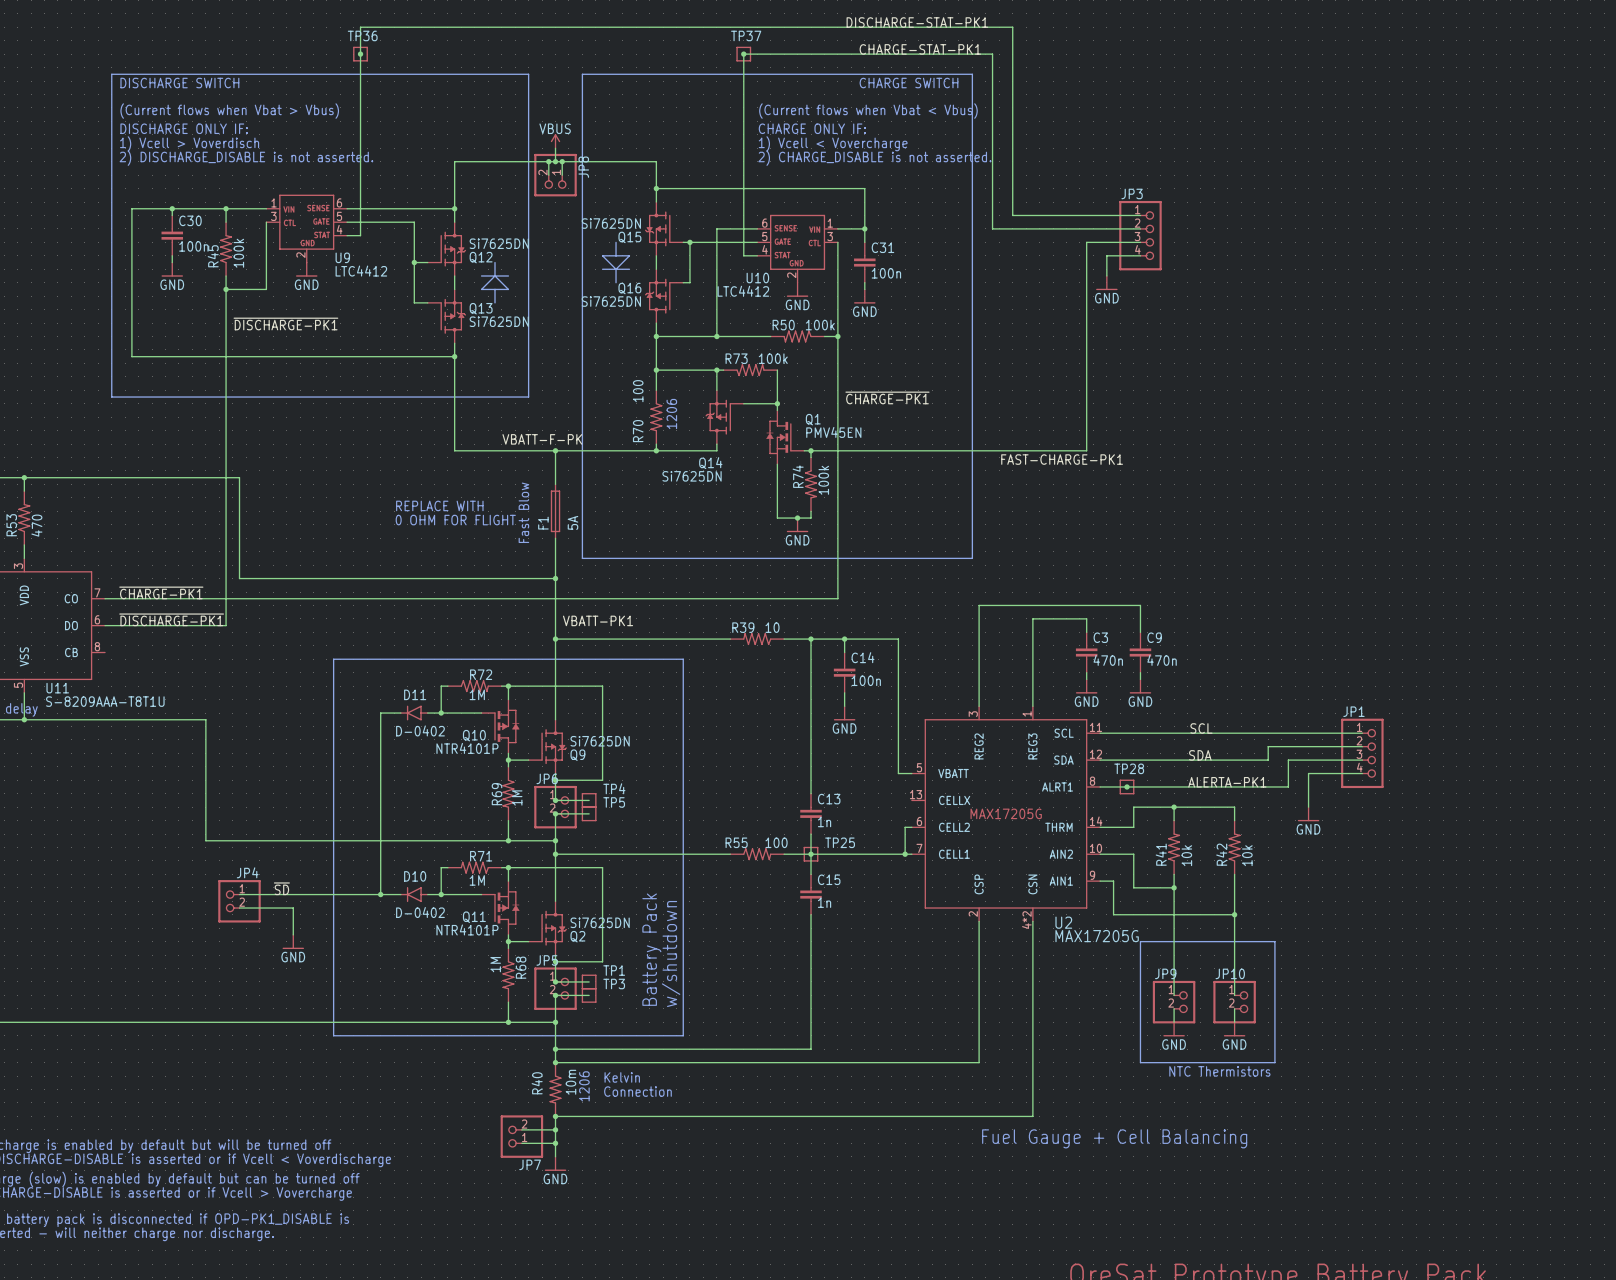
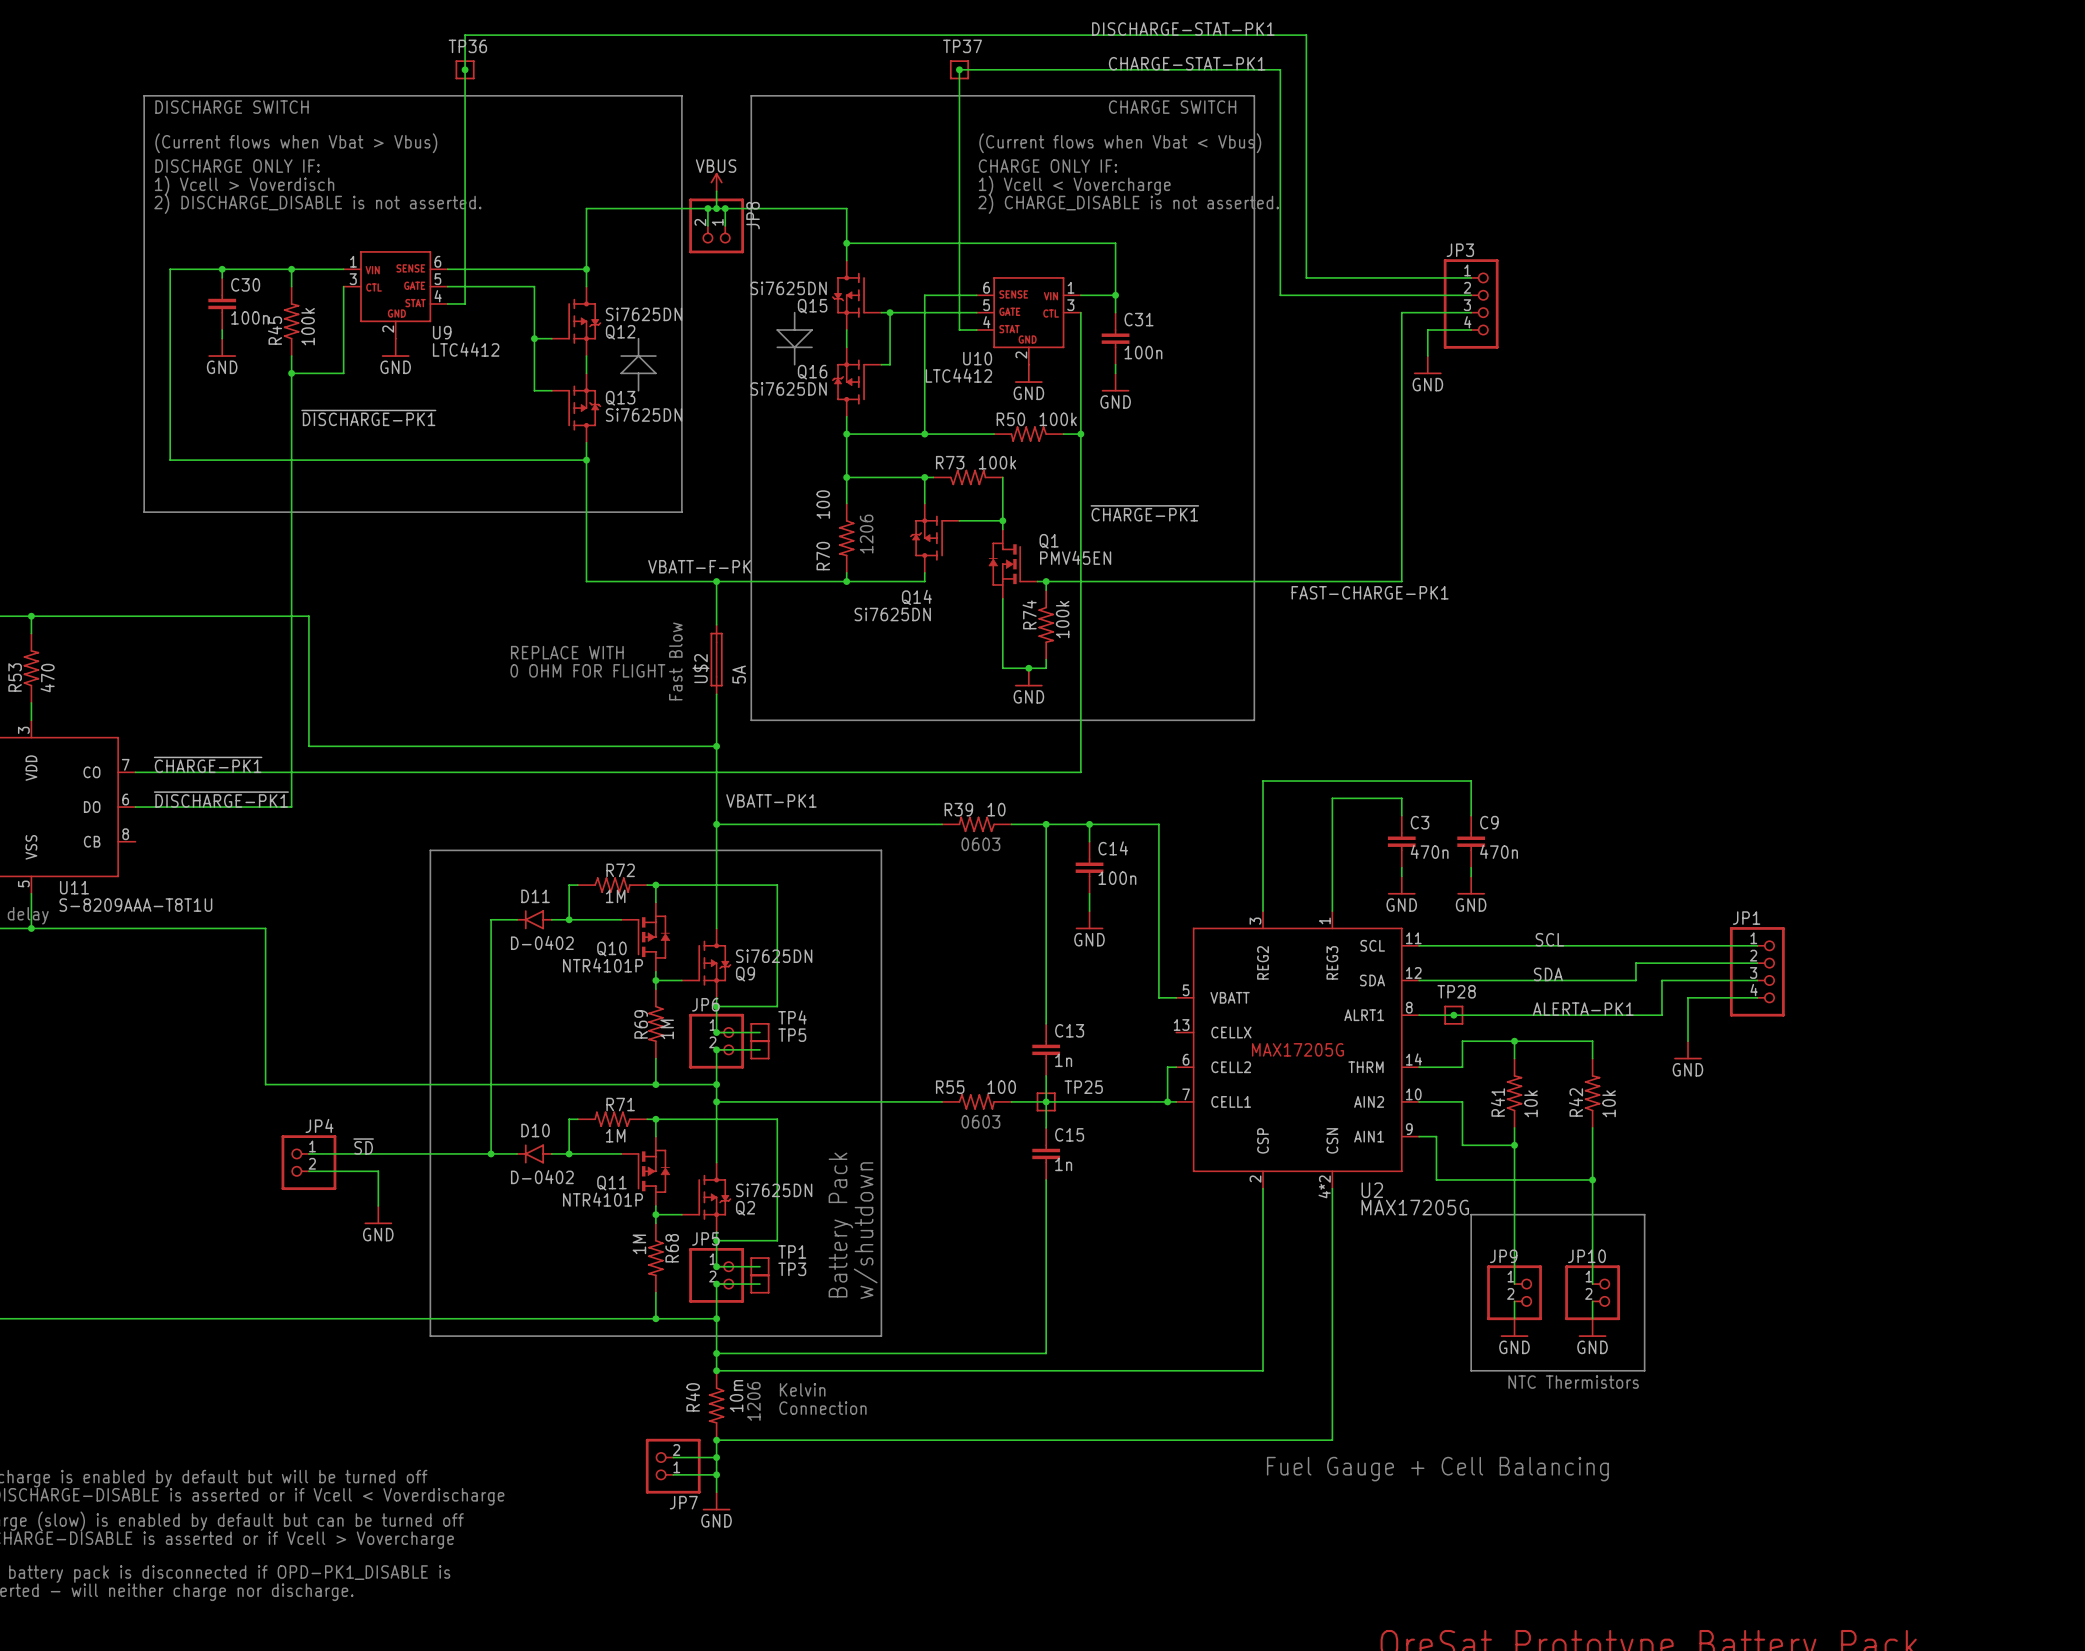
F1 name: F1 (543, 523) -> U$2 (700, 668)
text: none -> 0603 (980, 844)
text: none -> 0603 (980, 1121)

